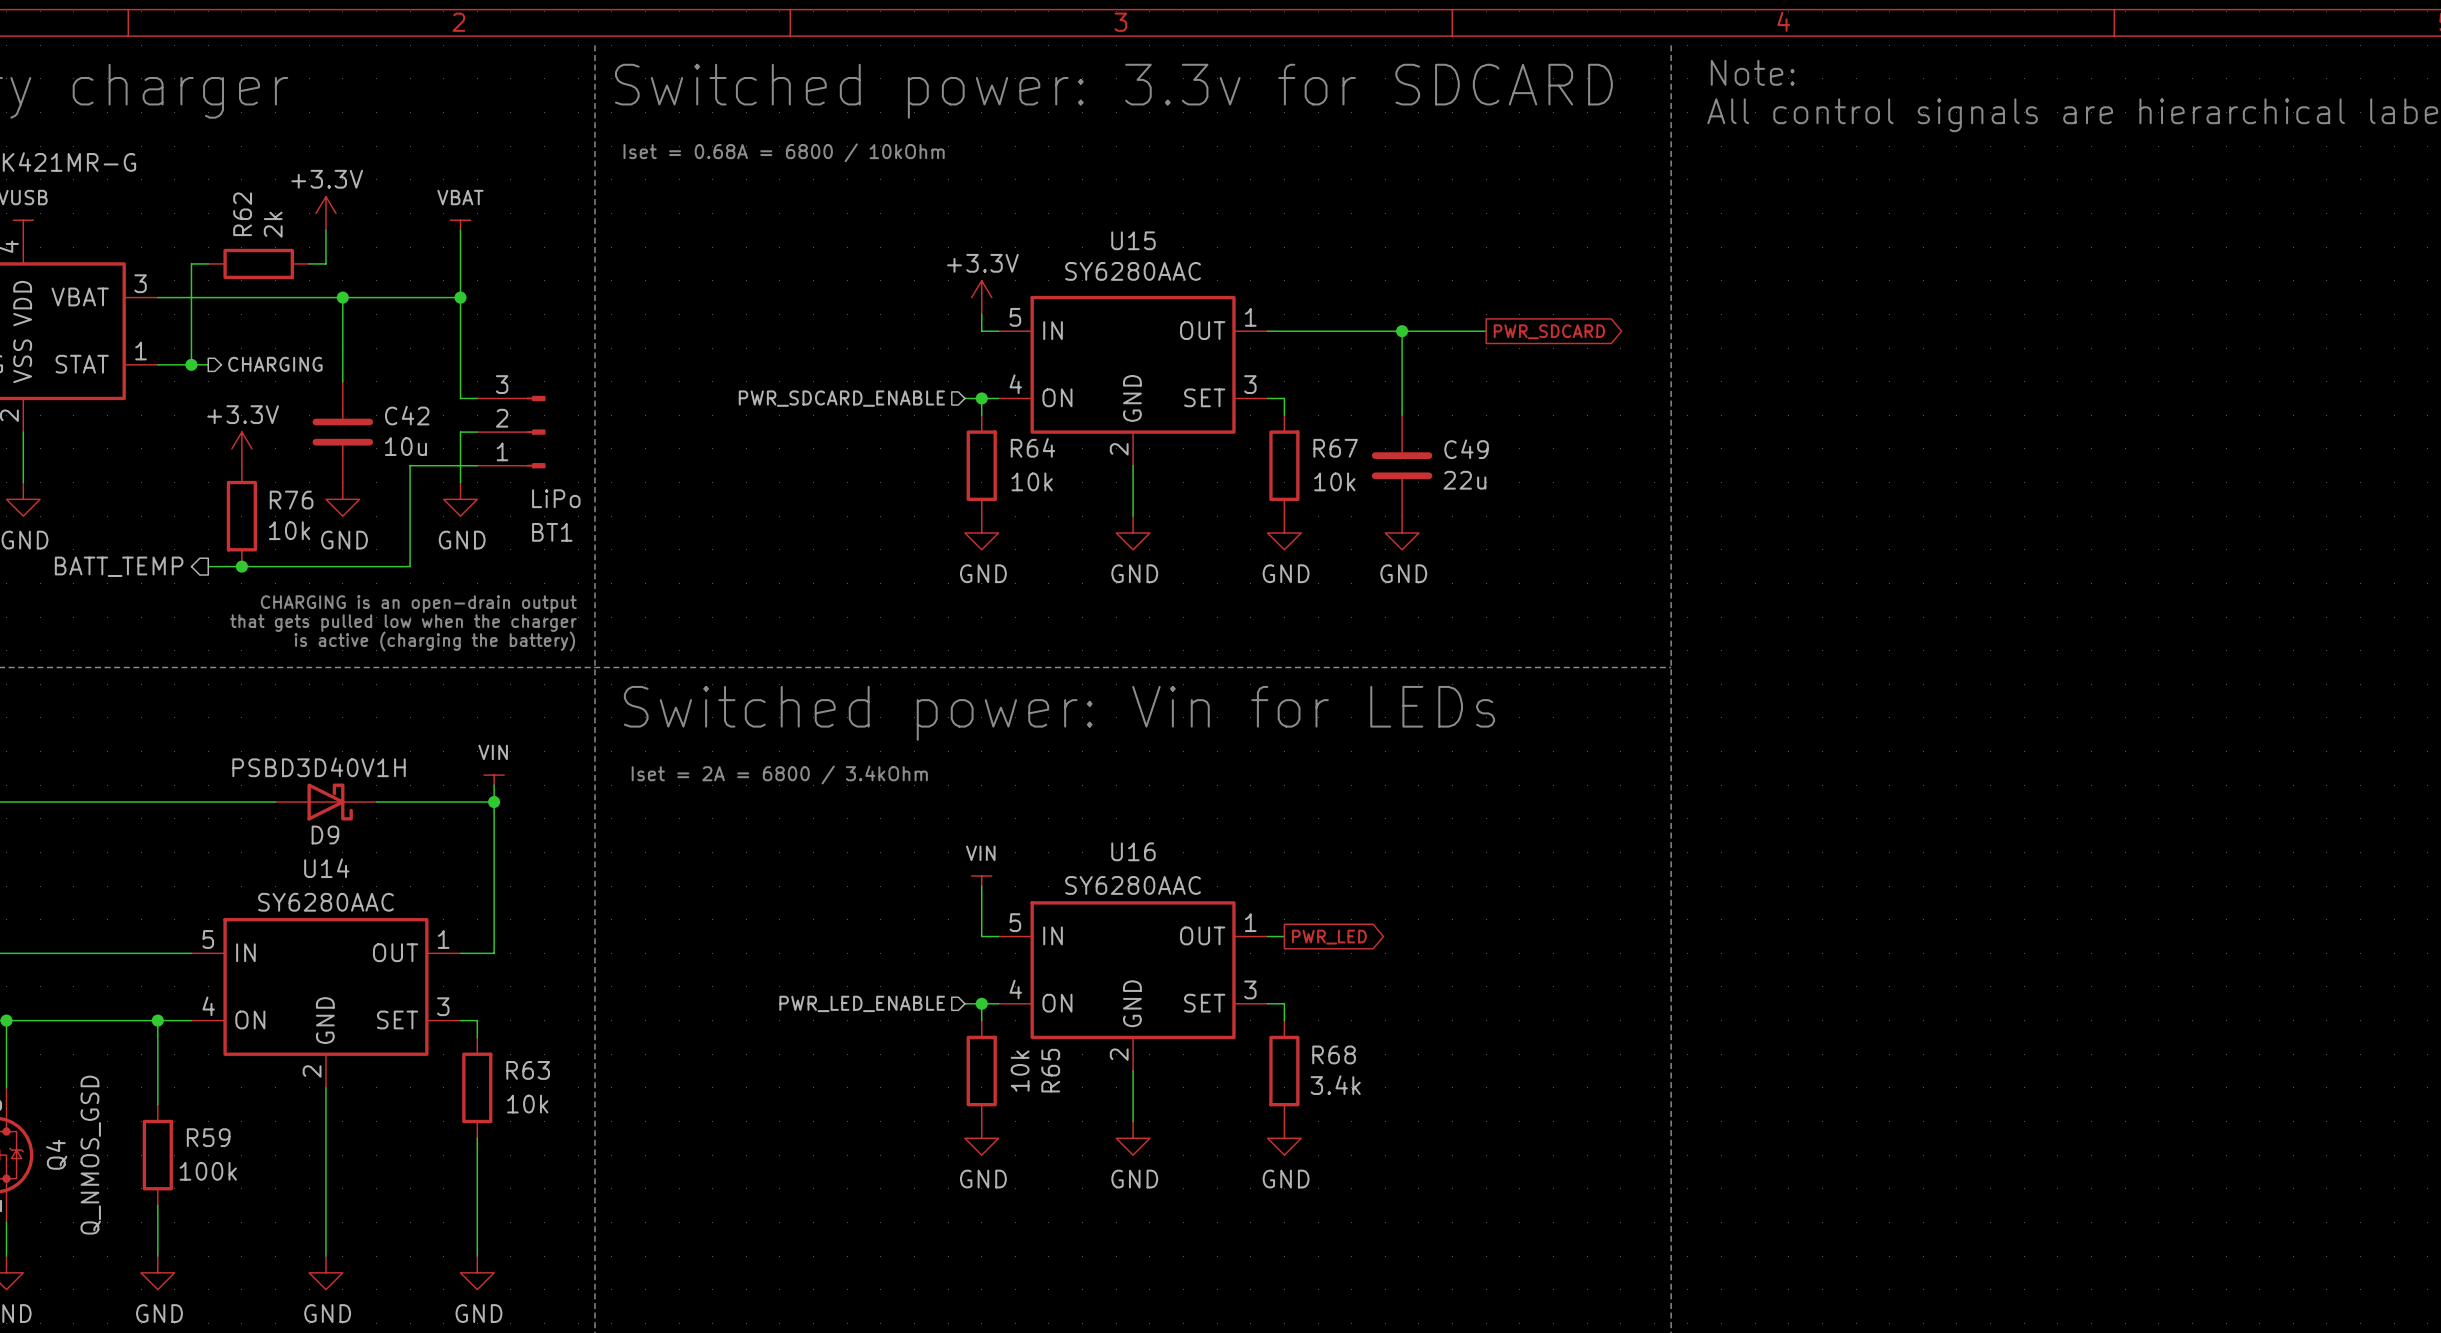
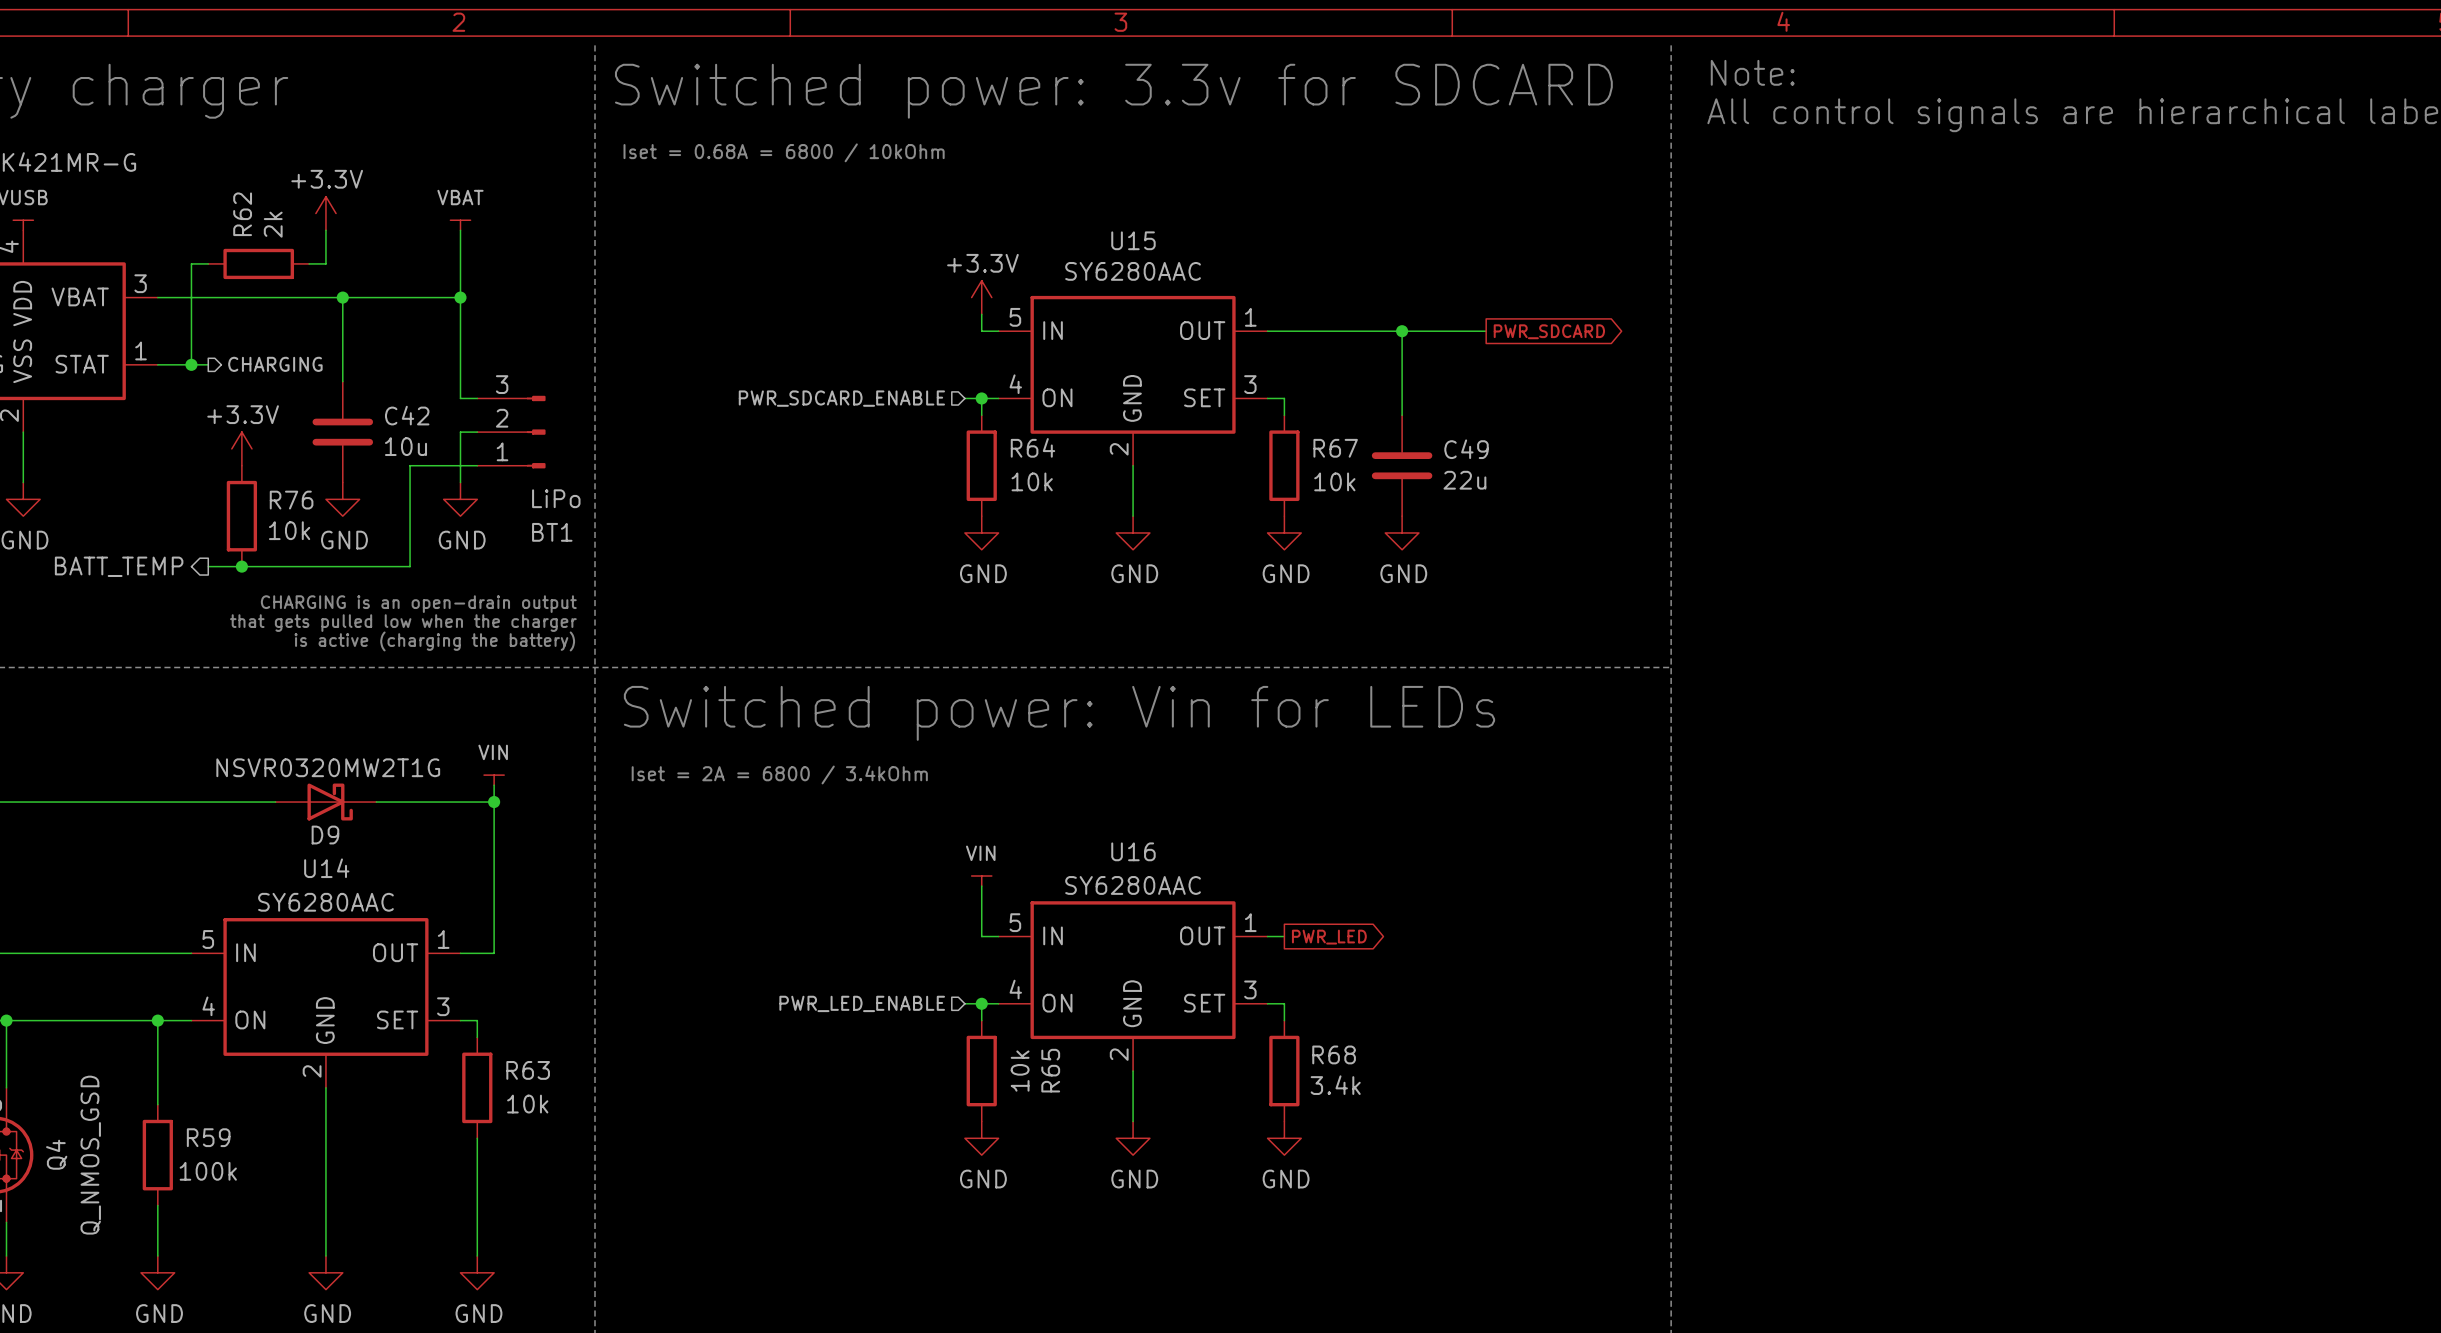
D9 value: PSBD3D40V1H (319, 767) -> NSVR0320MW2T1G (328, 767)

